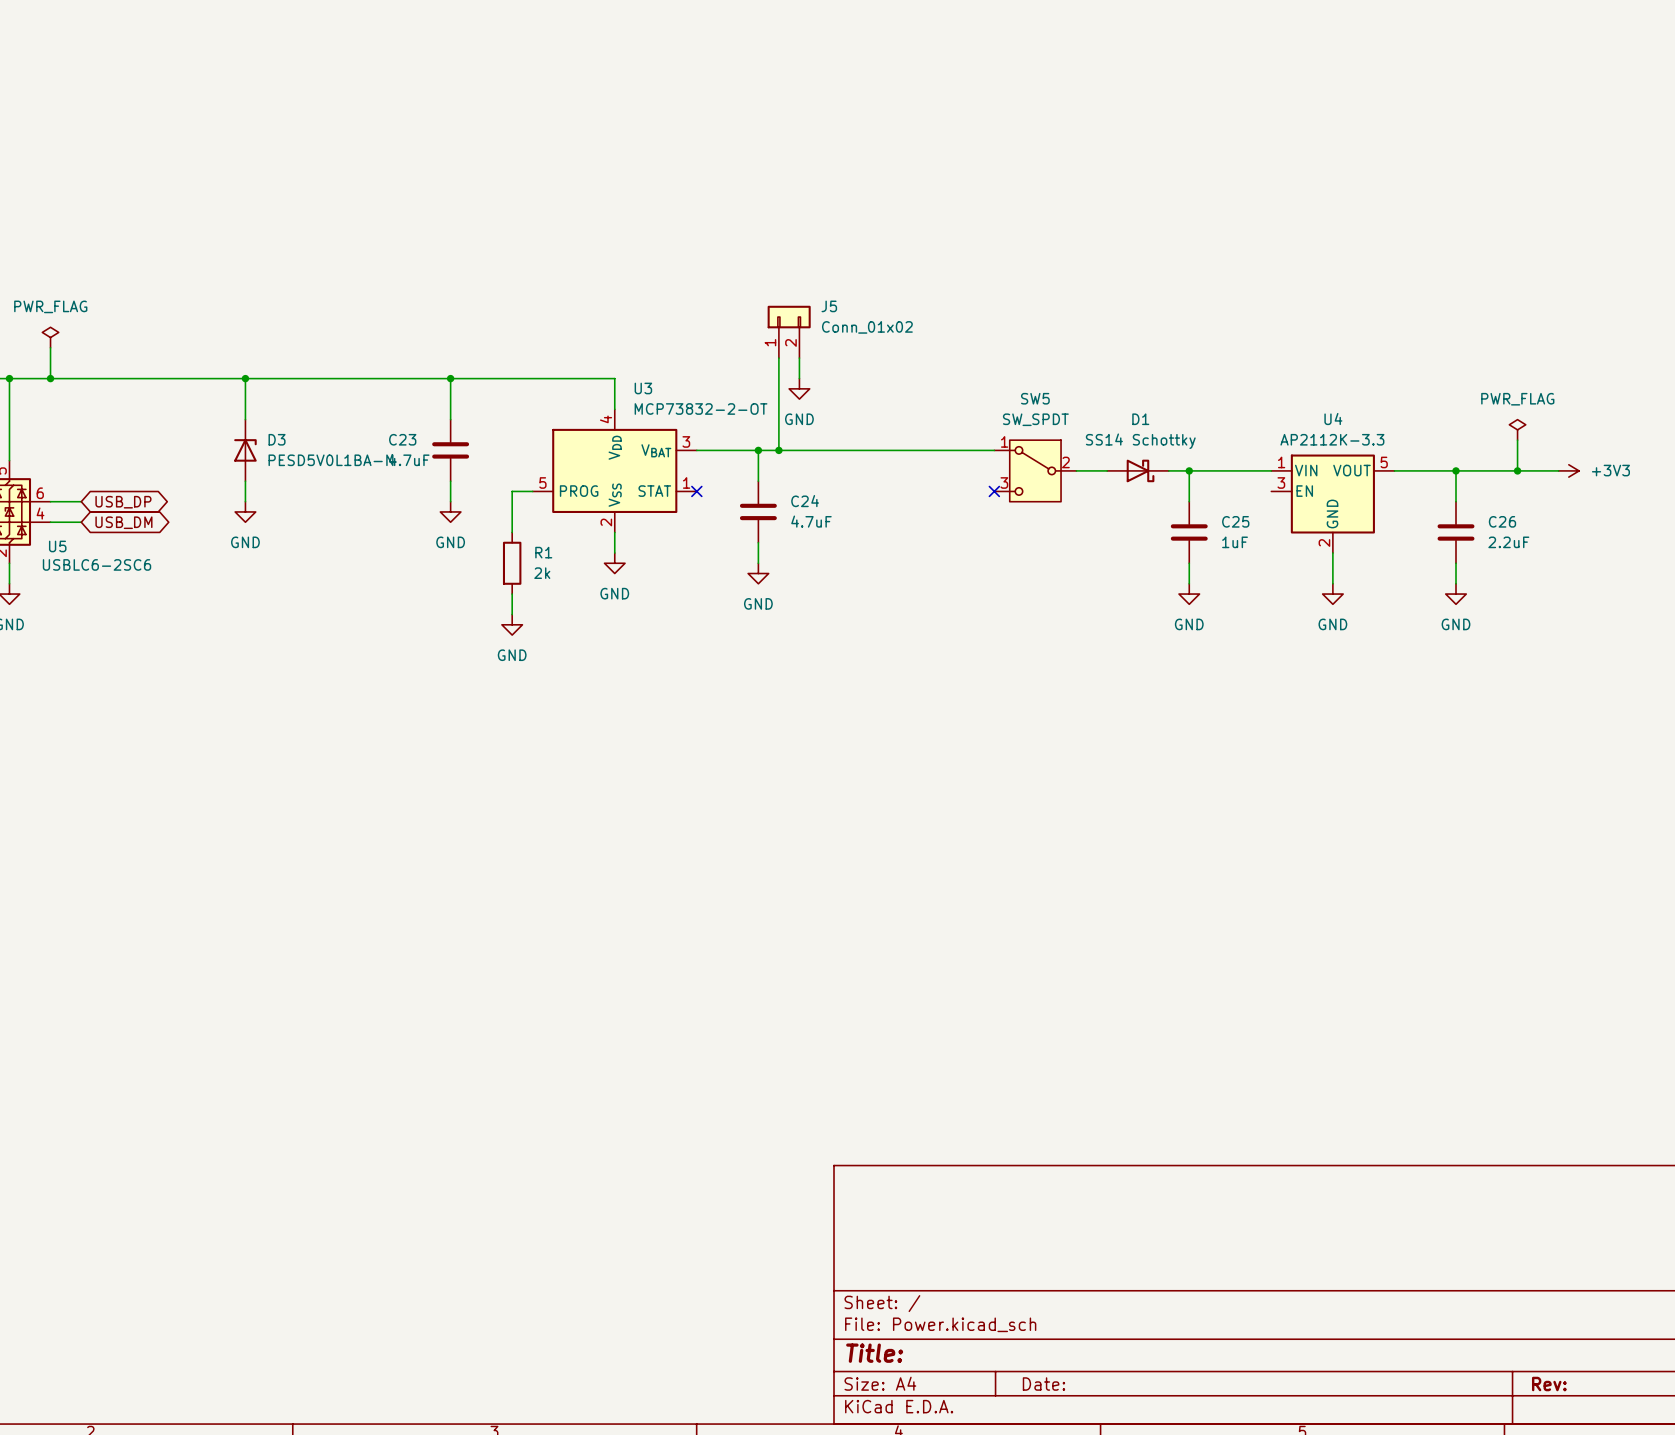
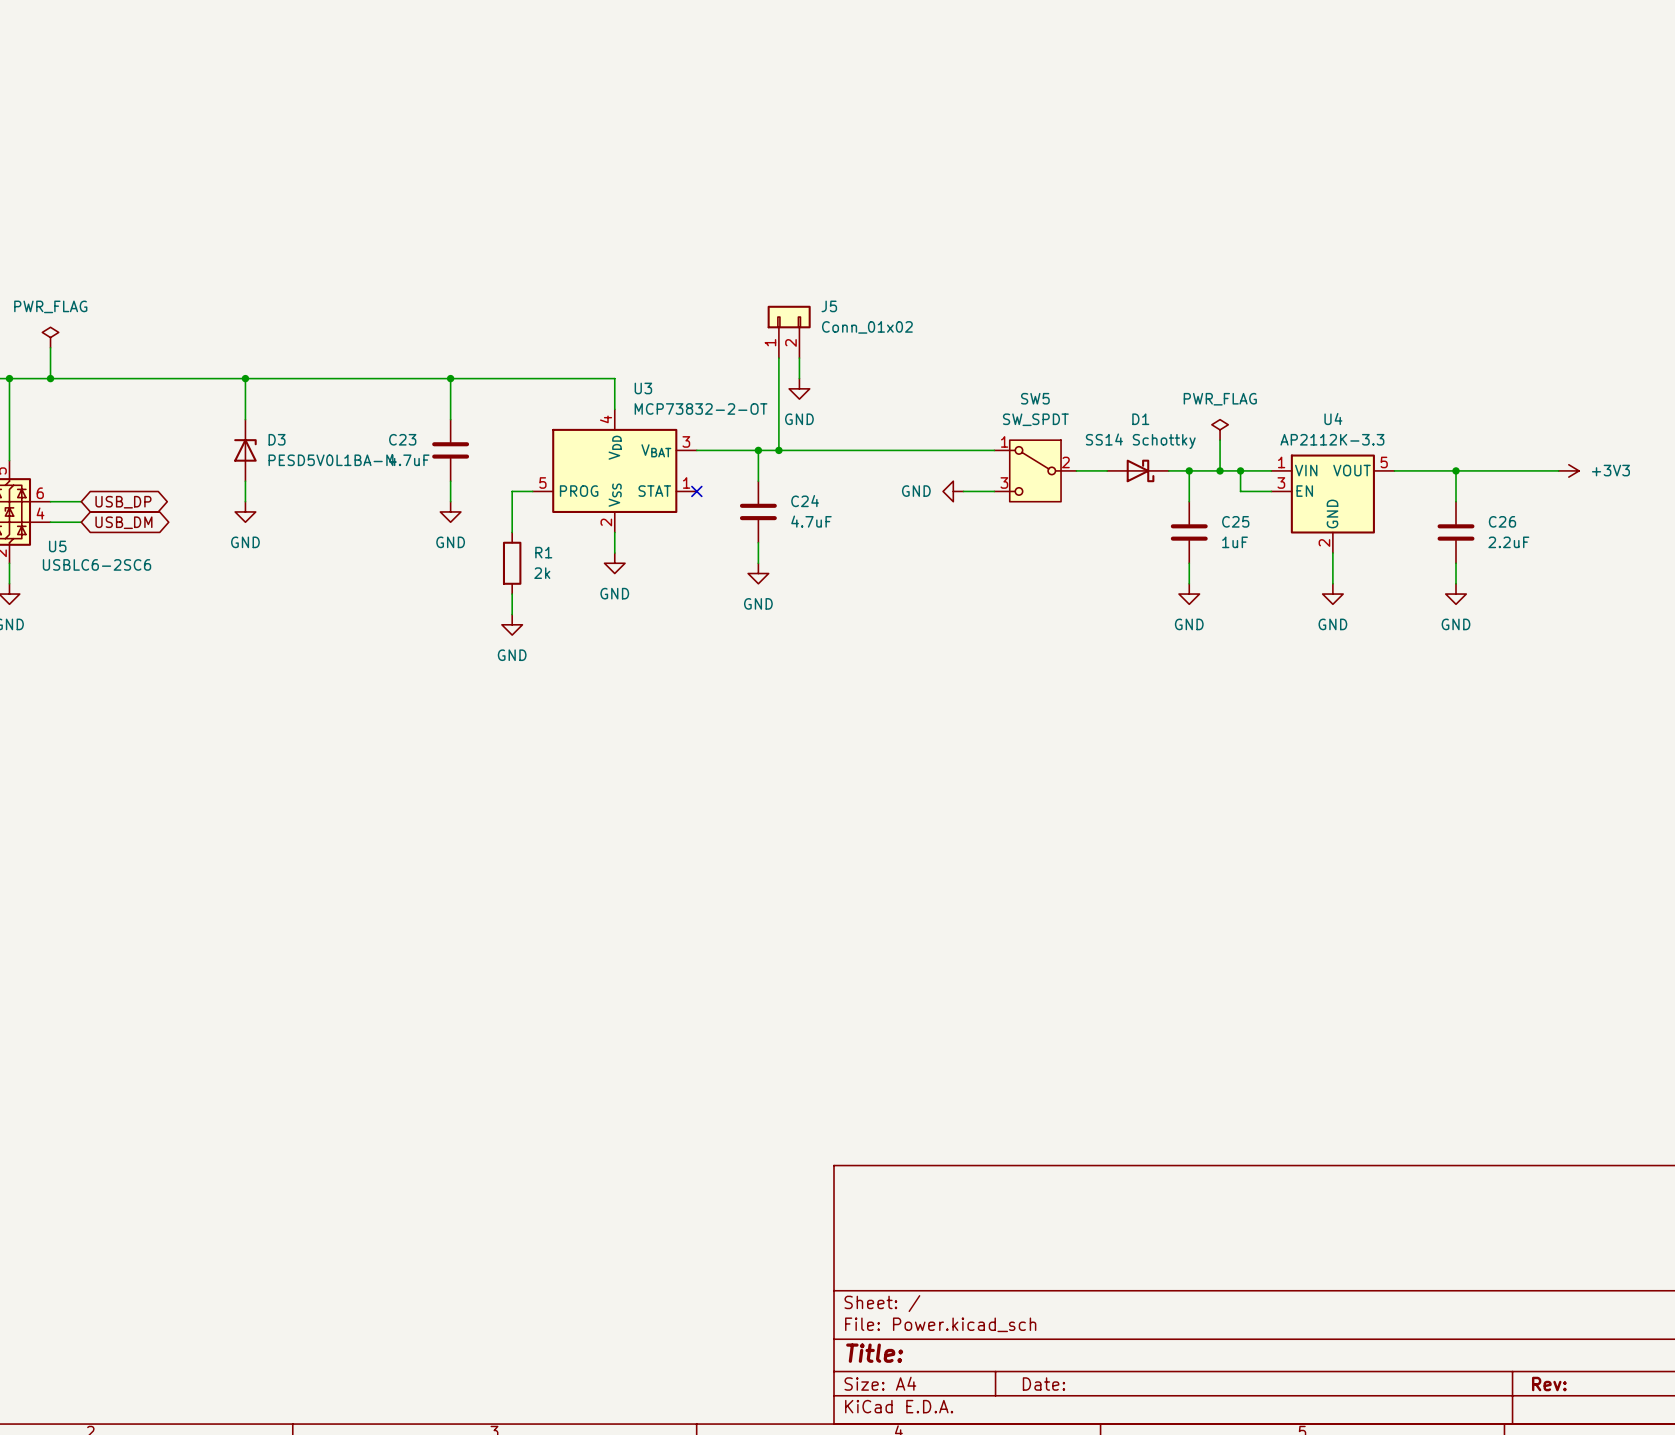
power symbol: none -> PWR_FLAG (1220, 429)
power symbol: PWR_FLAG (1517, 429) -> none
wire: none -> (1220, 440) (1220, 470)
wire: (1517, 440) (1517, 470) -> none
junction: none -> (1220, 470)
wire: none -> (1240, 470) (1240, 491) (1271, 491)
junction: none -> (1240, 470)
junction: (1517, 470) -> none
power symbol: none -> GND (953, 491)
wire: none -> (963, 491) (994, 491)
no-connect mark: (994, 491) -> none

